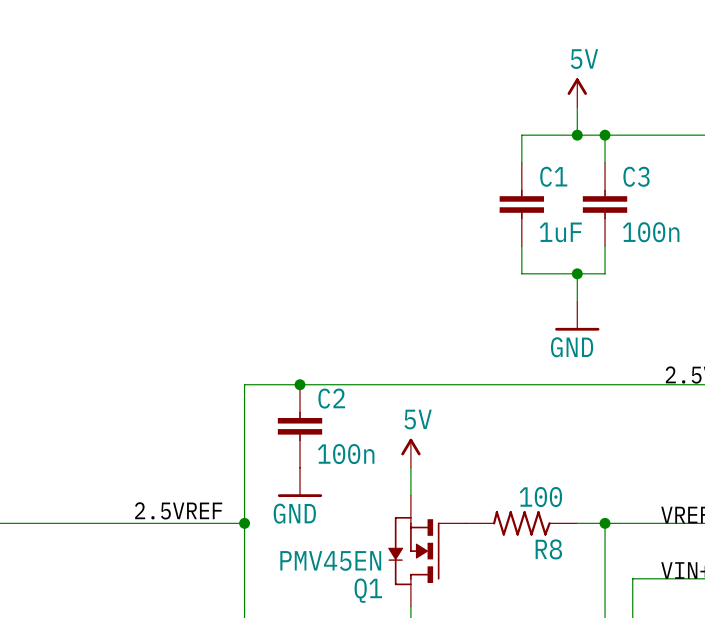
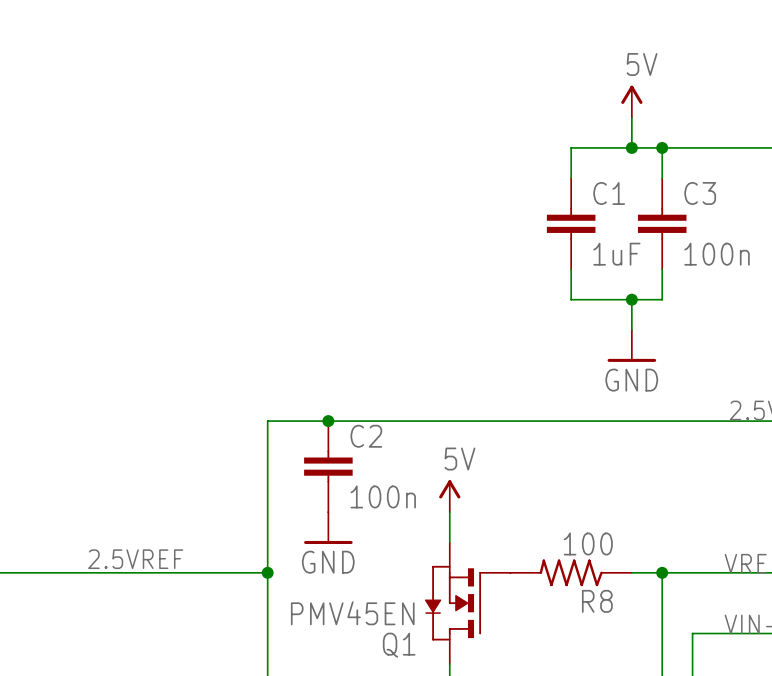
label position: 2.5VREF (178, 510) -> 2.5VREF (135, 559)

